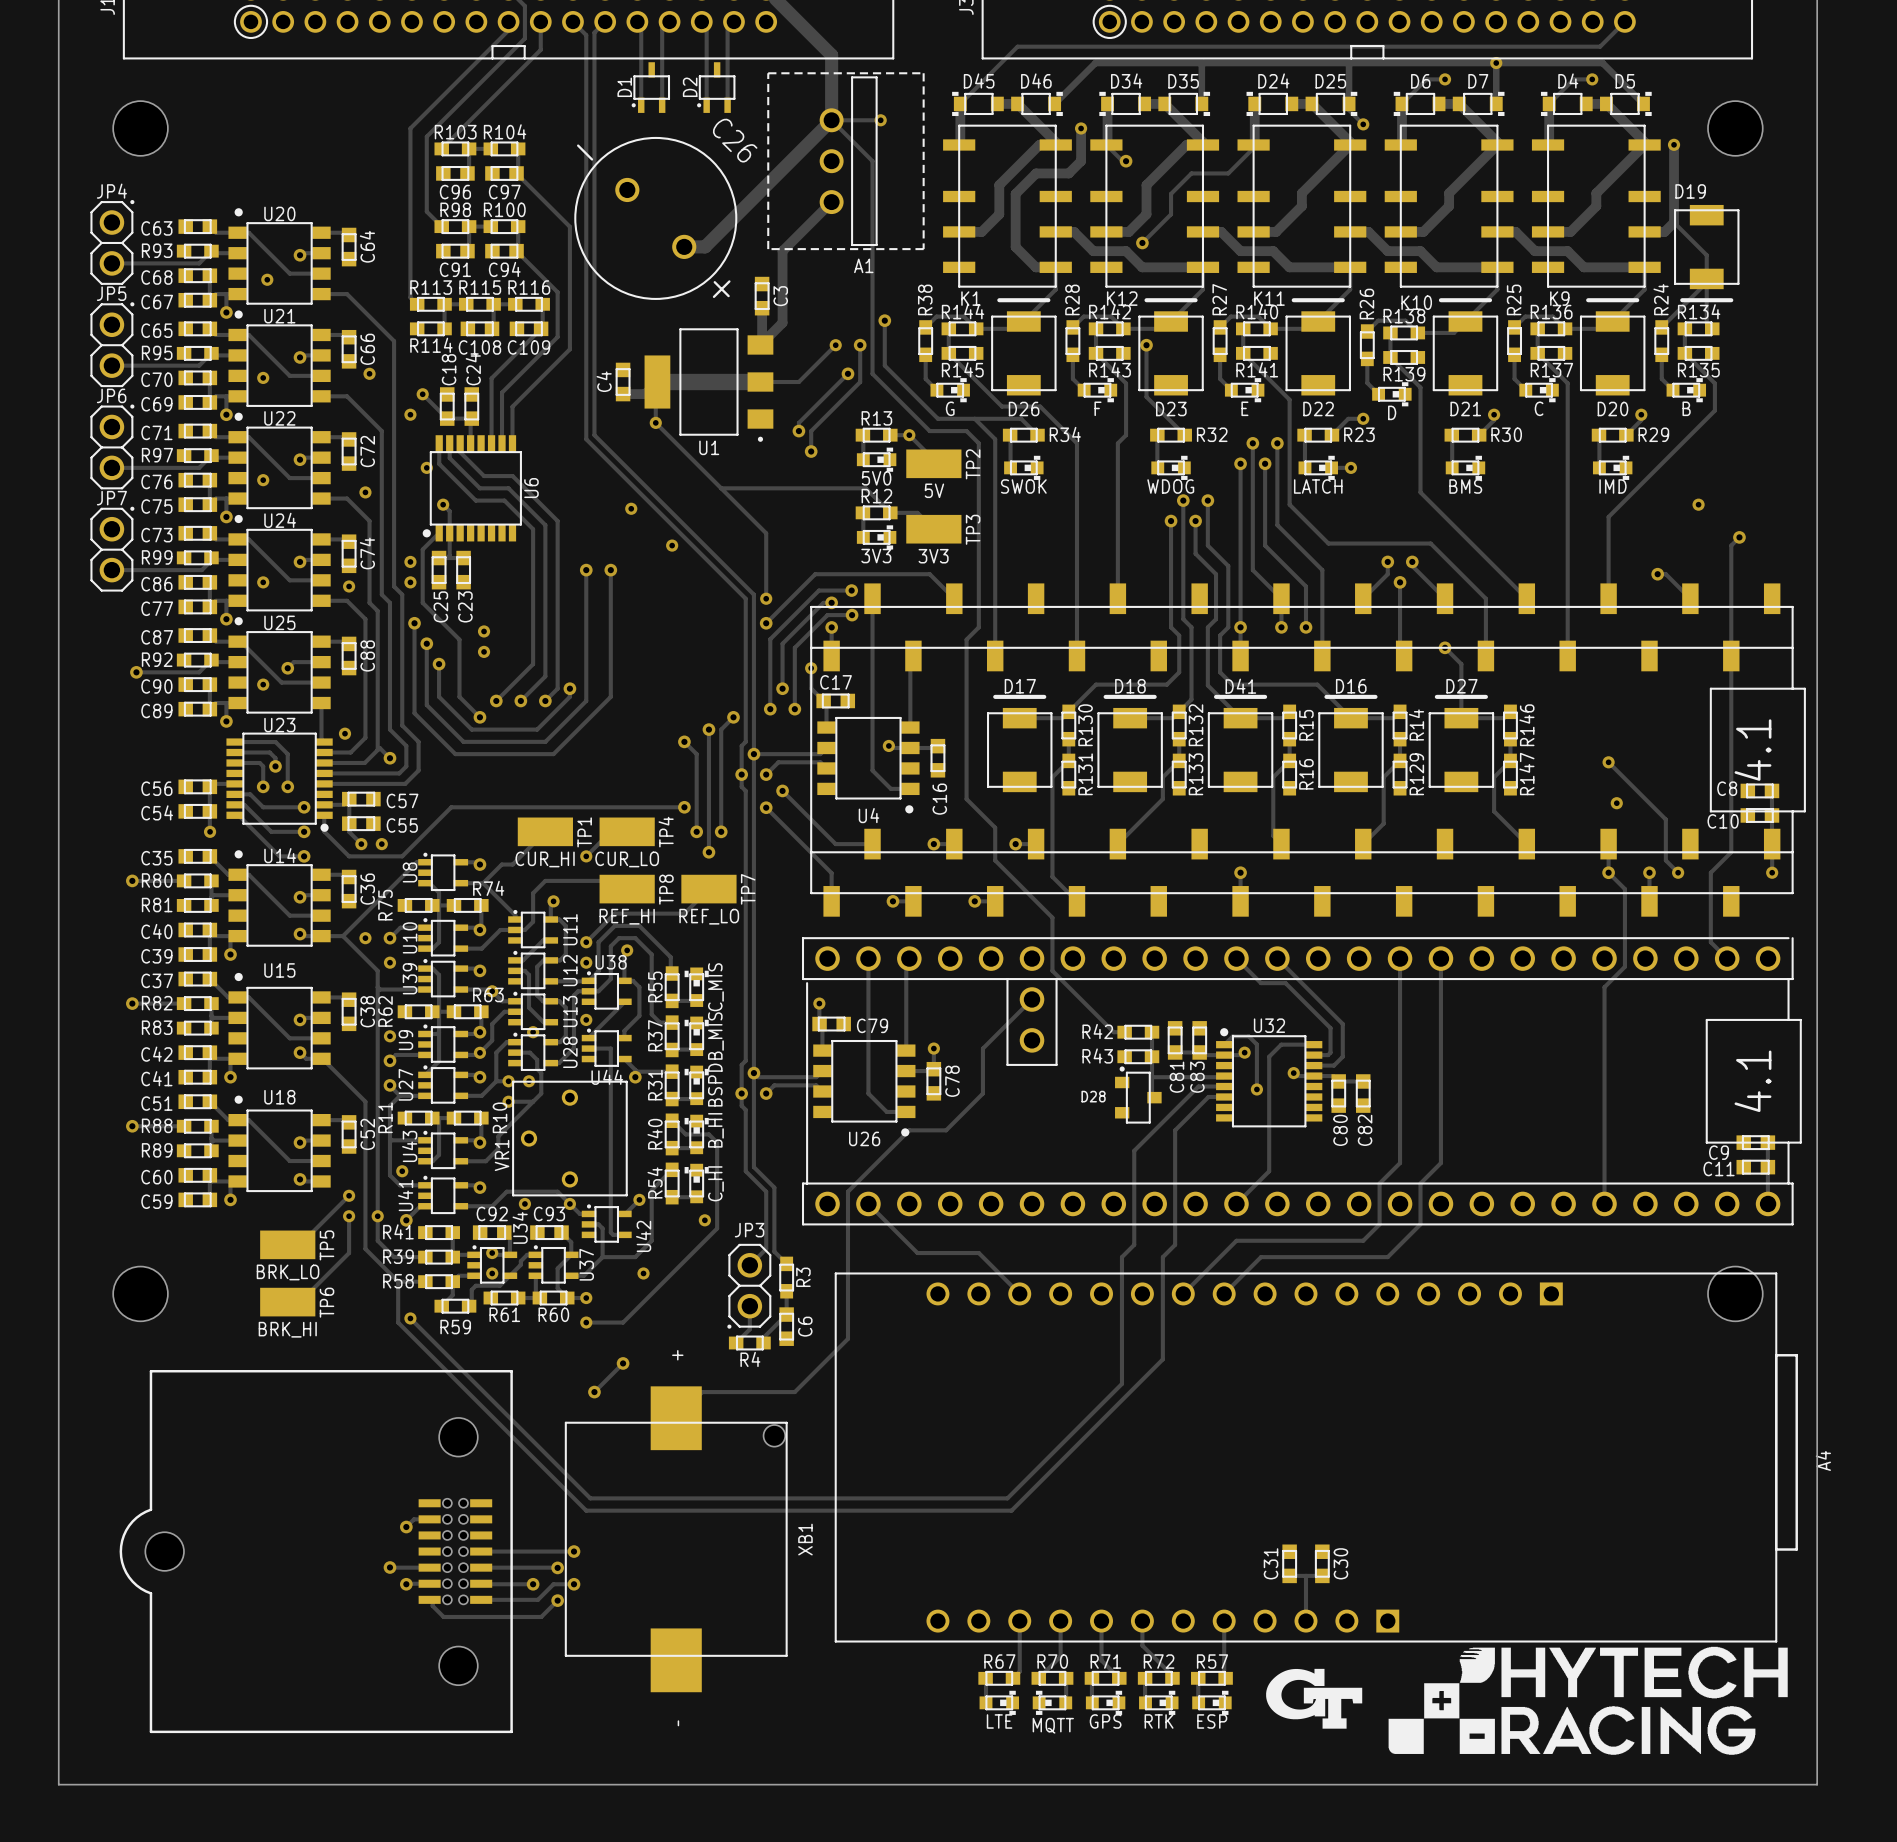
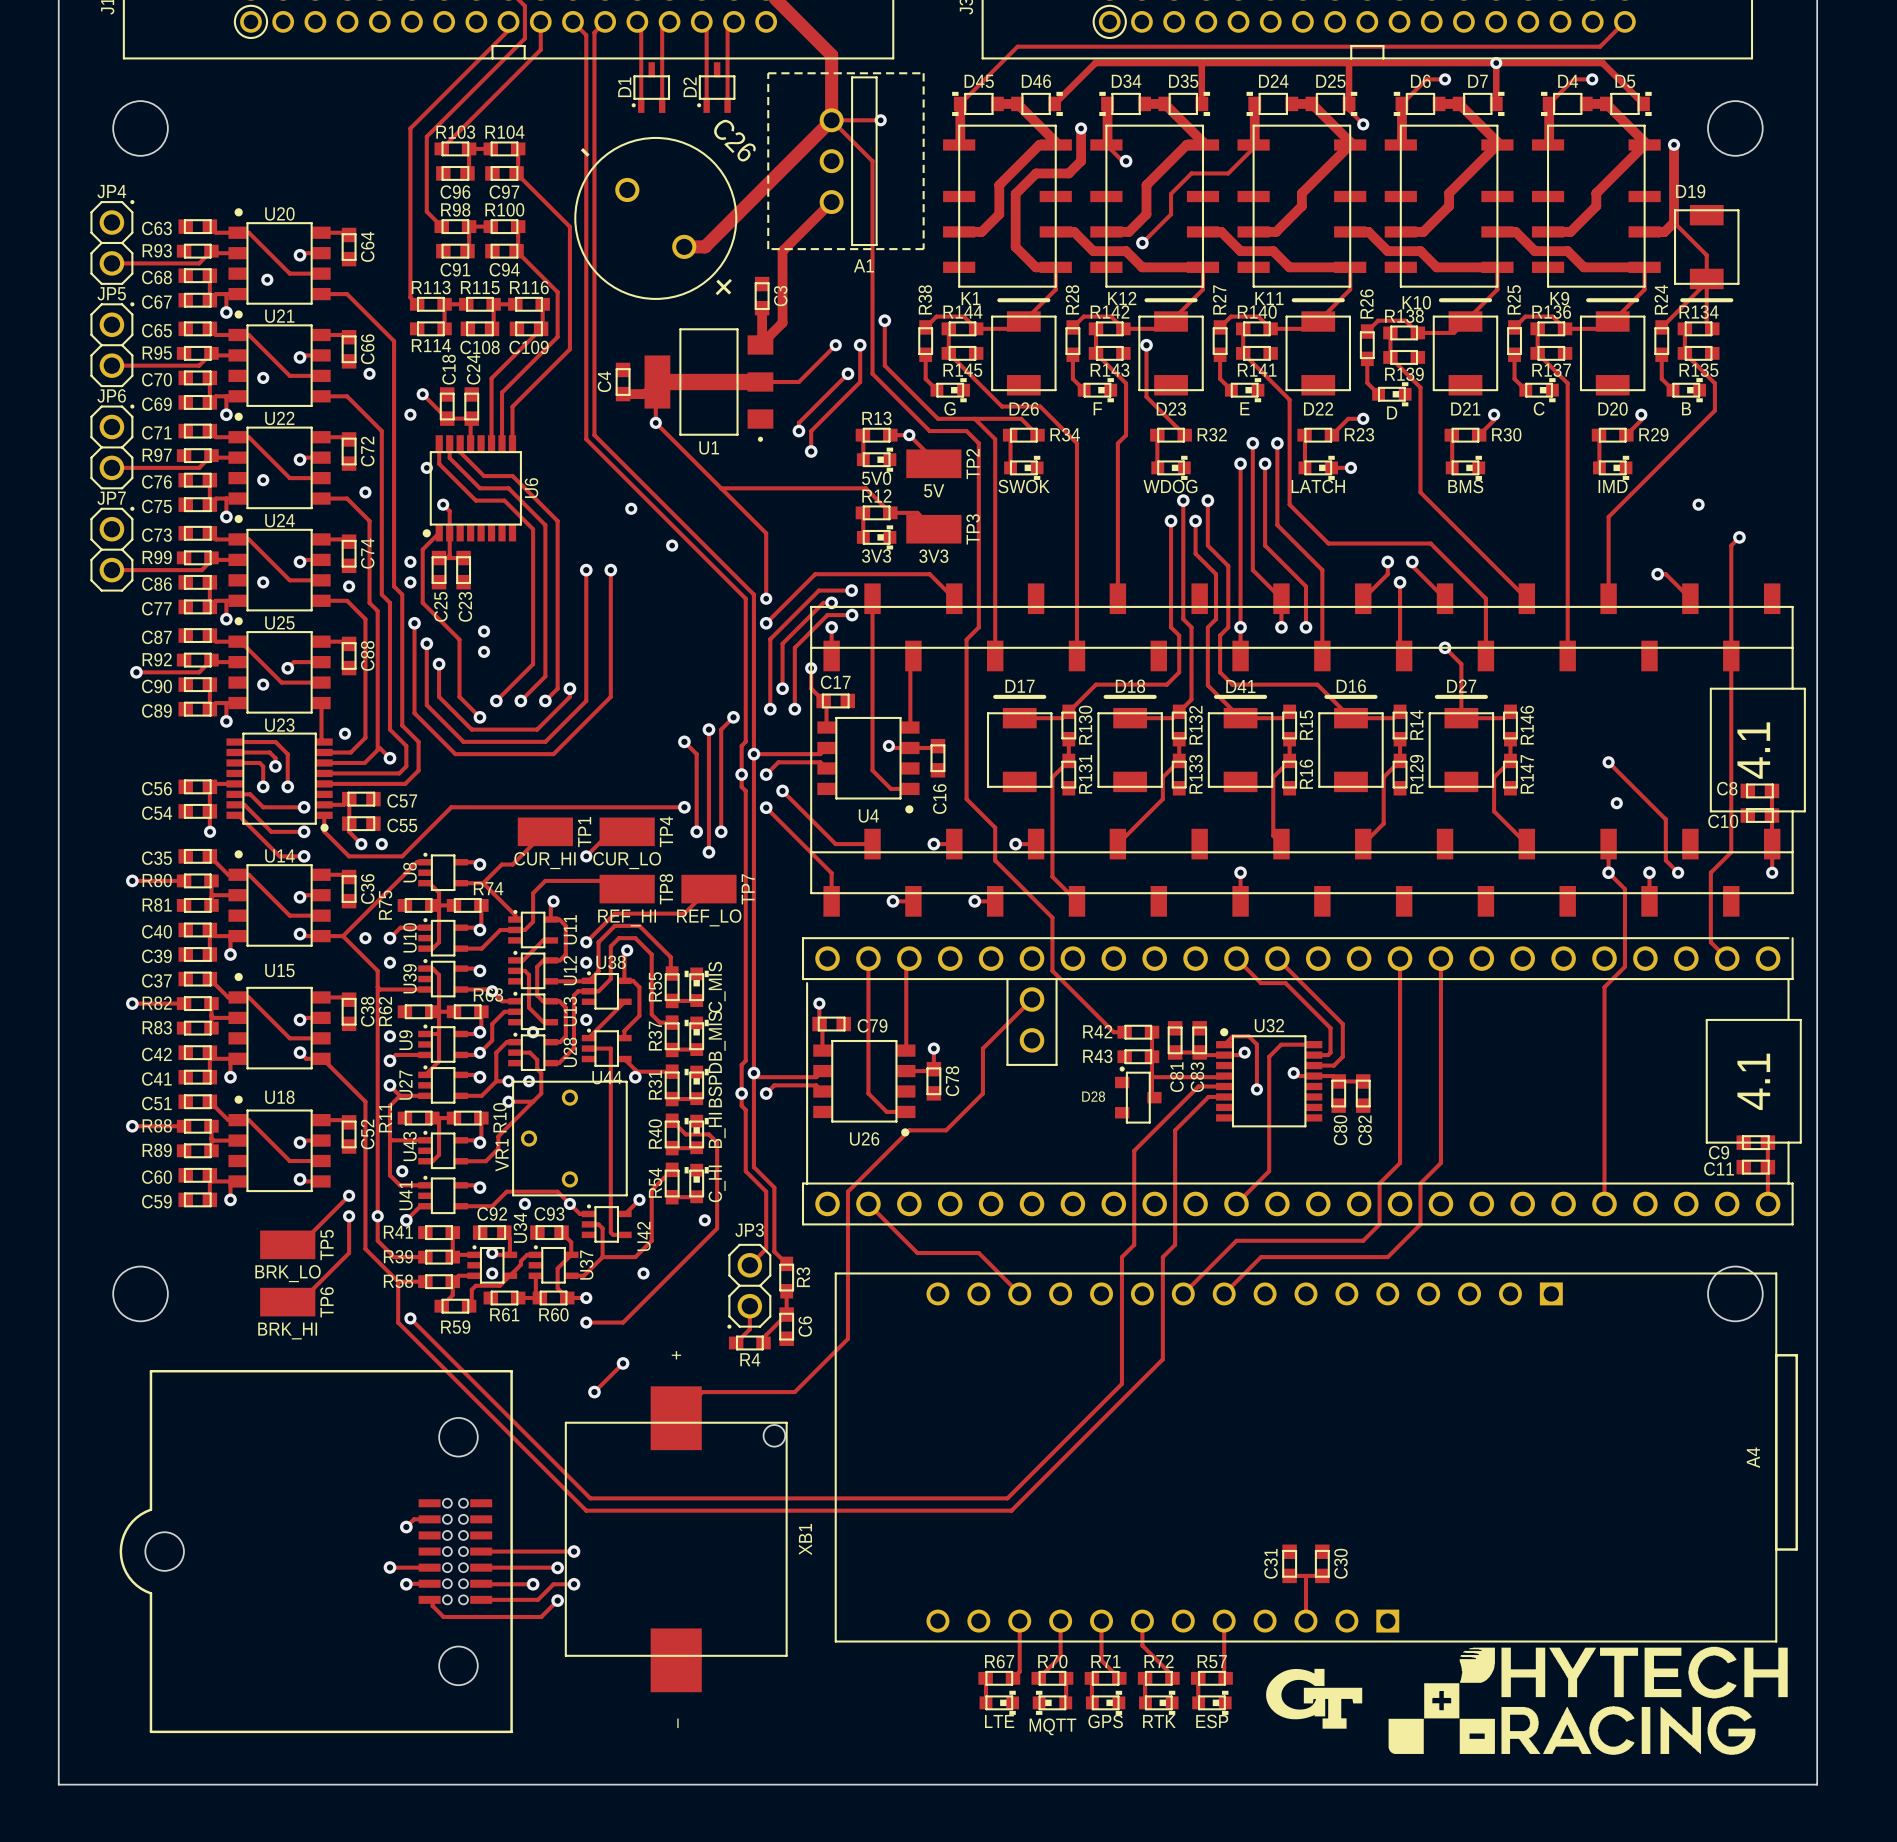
A4 name position: A4 (1823, 1460) -> A4 (1753, 1457)

